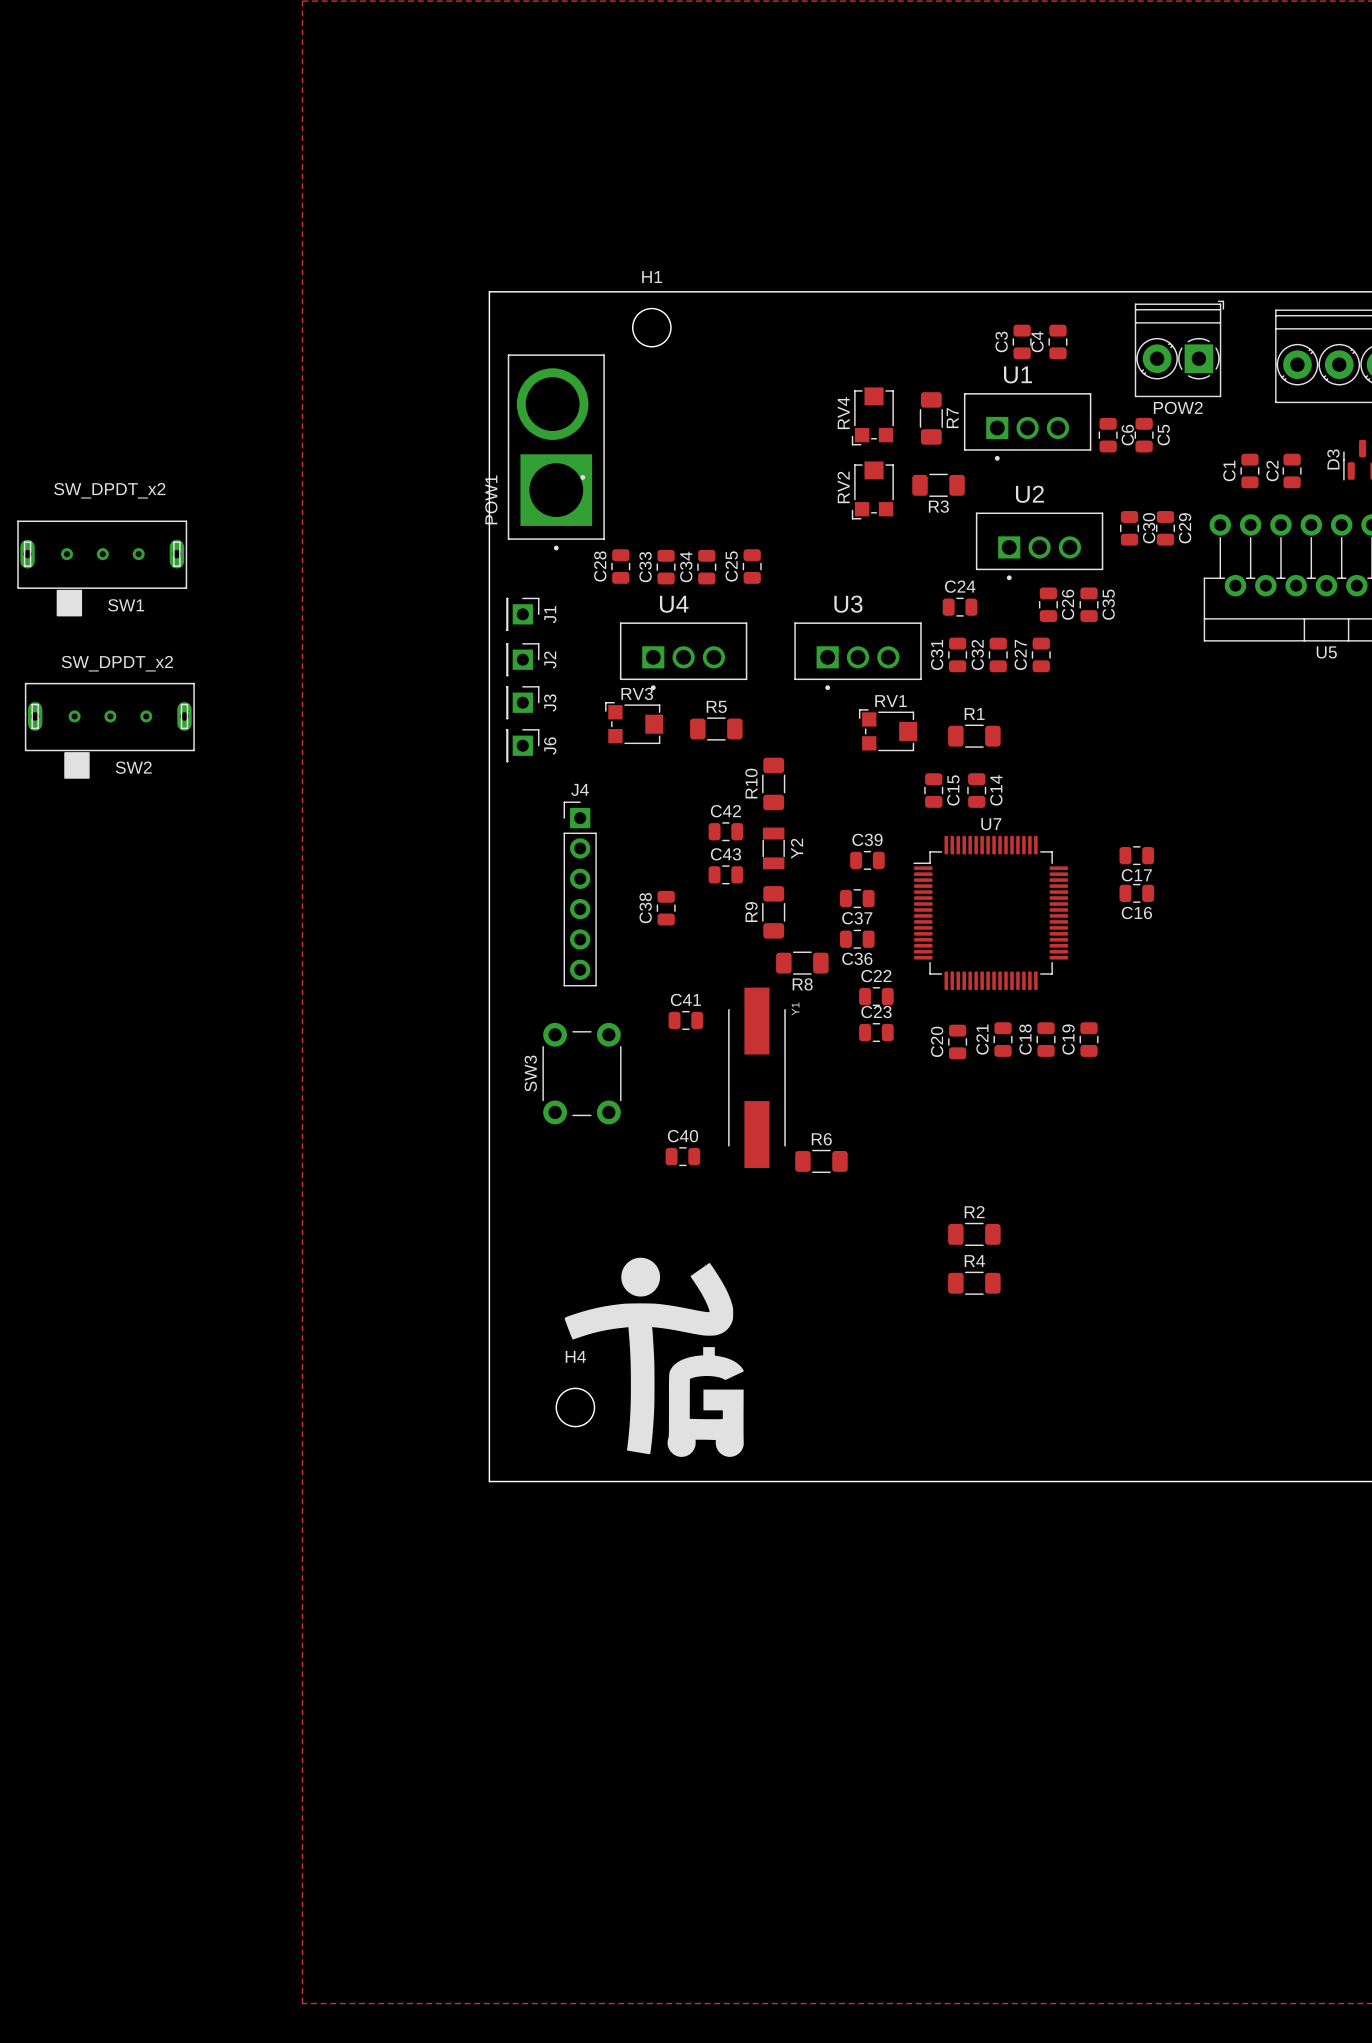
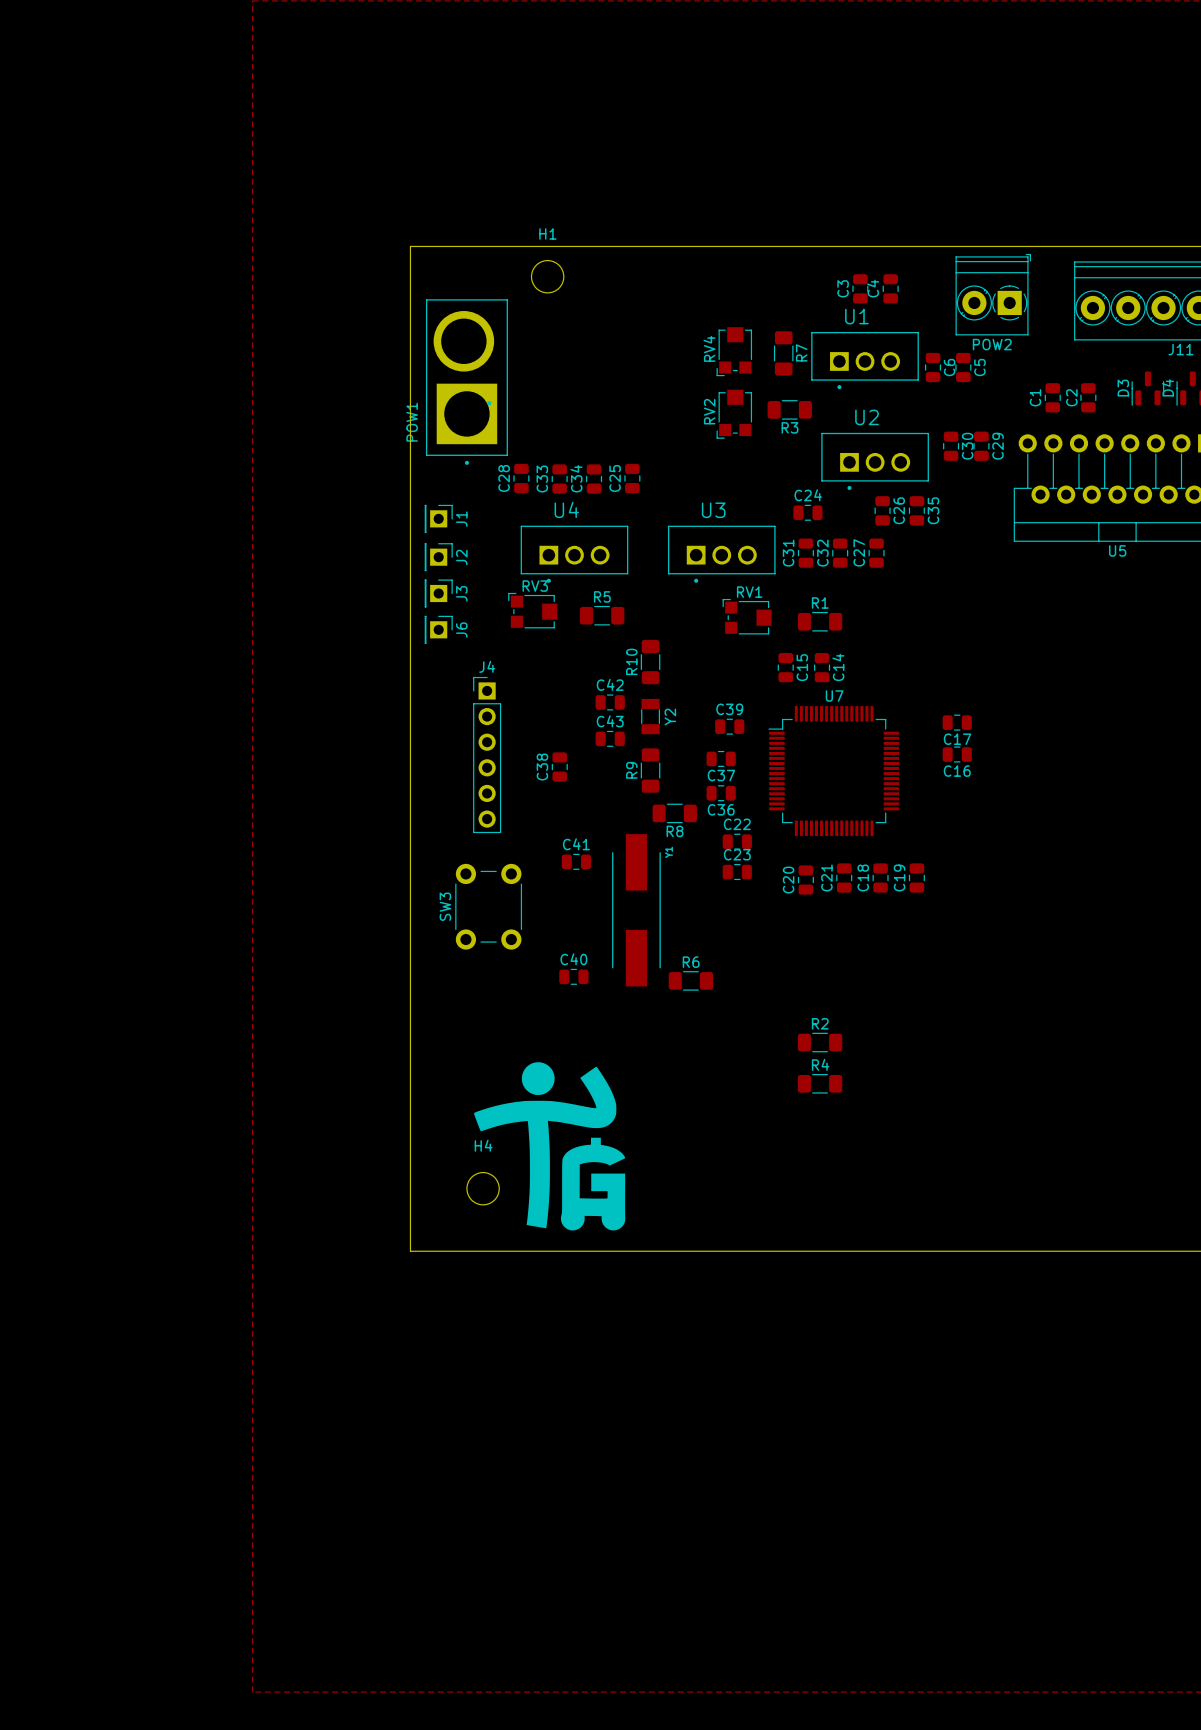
SW1: SW_DPDT_x2 (102, 568) -> none
SW2: SW_DPDT_x2 (109, 730) -> none

